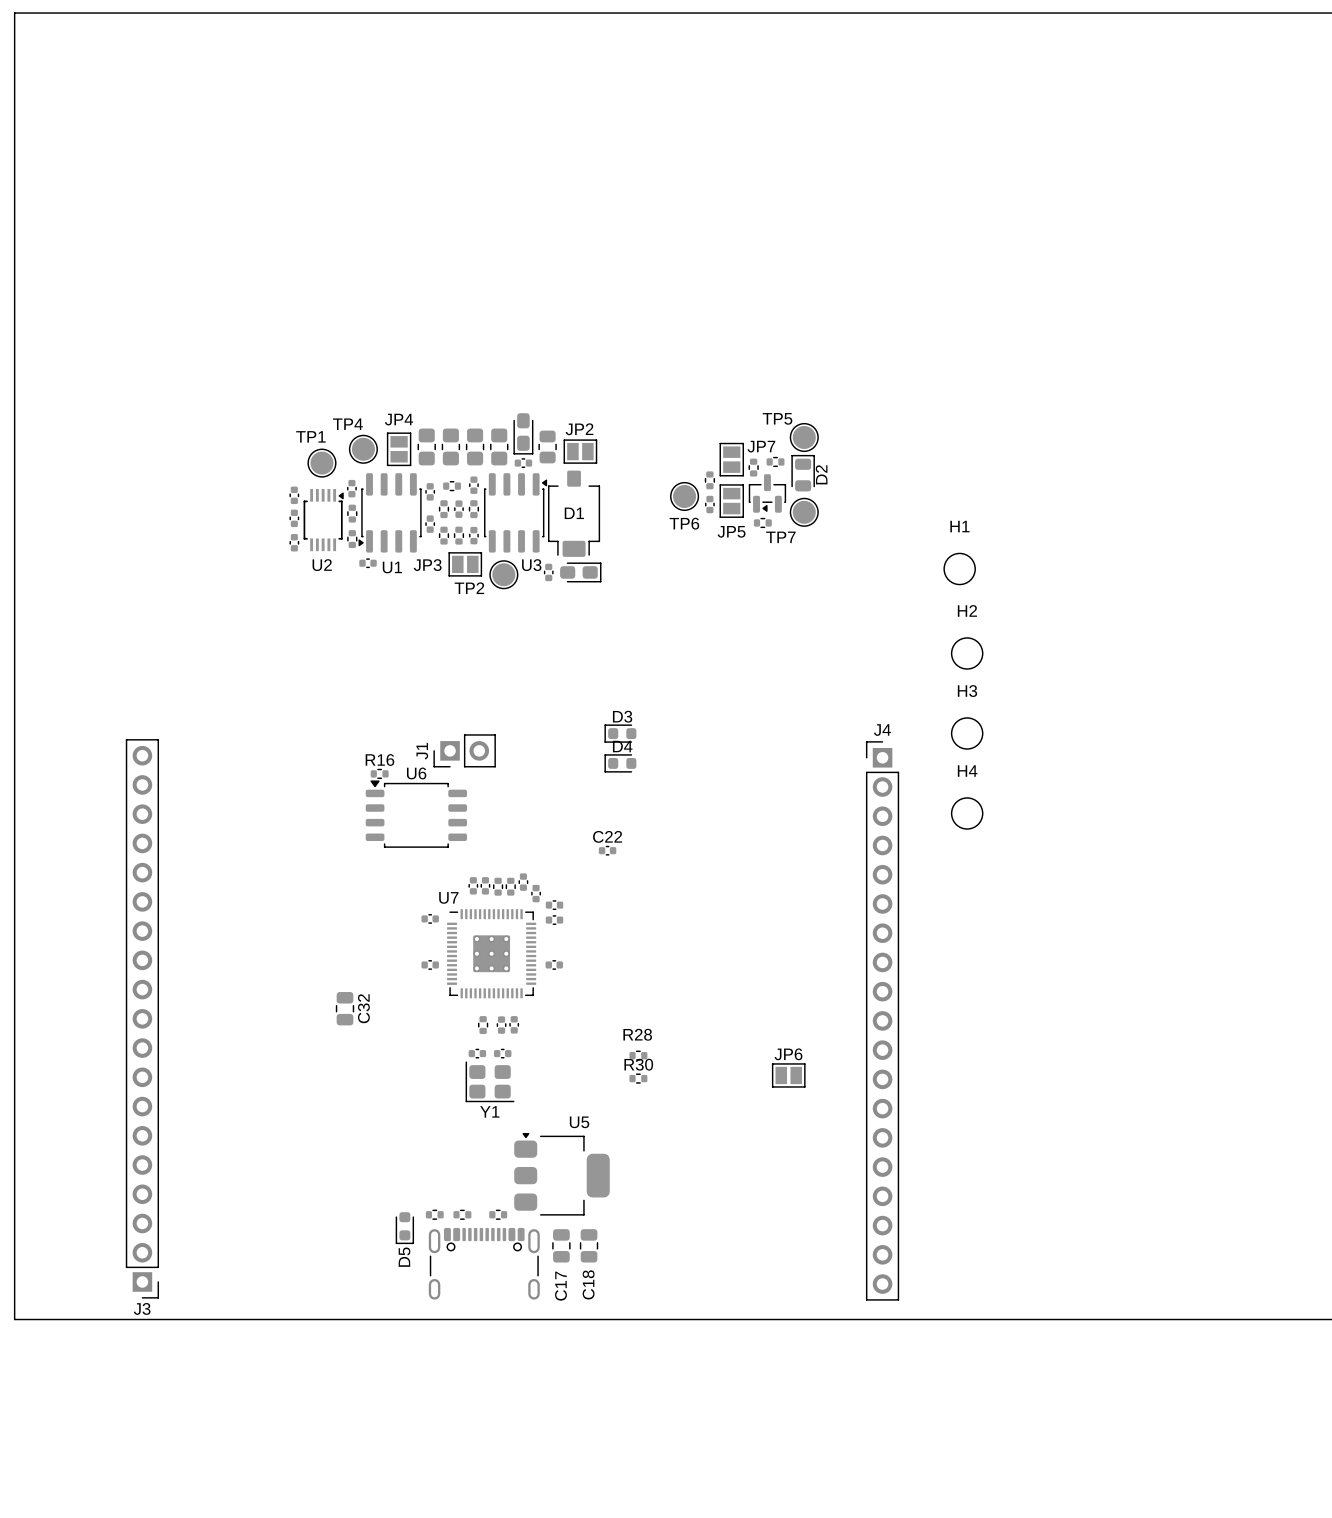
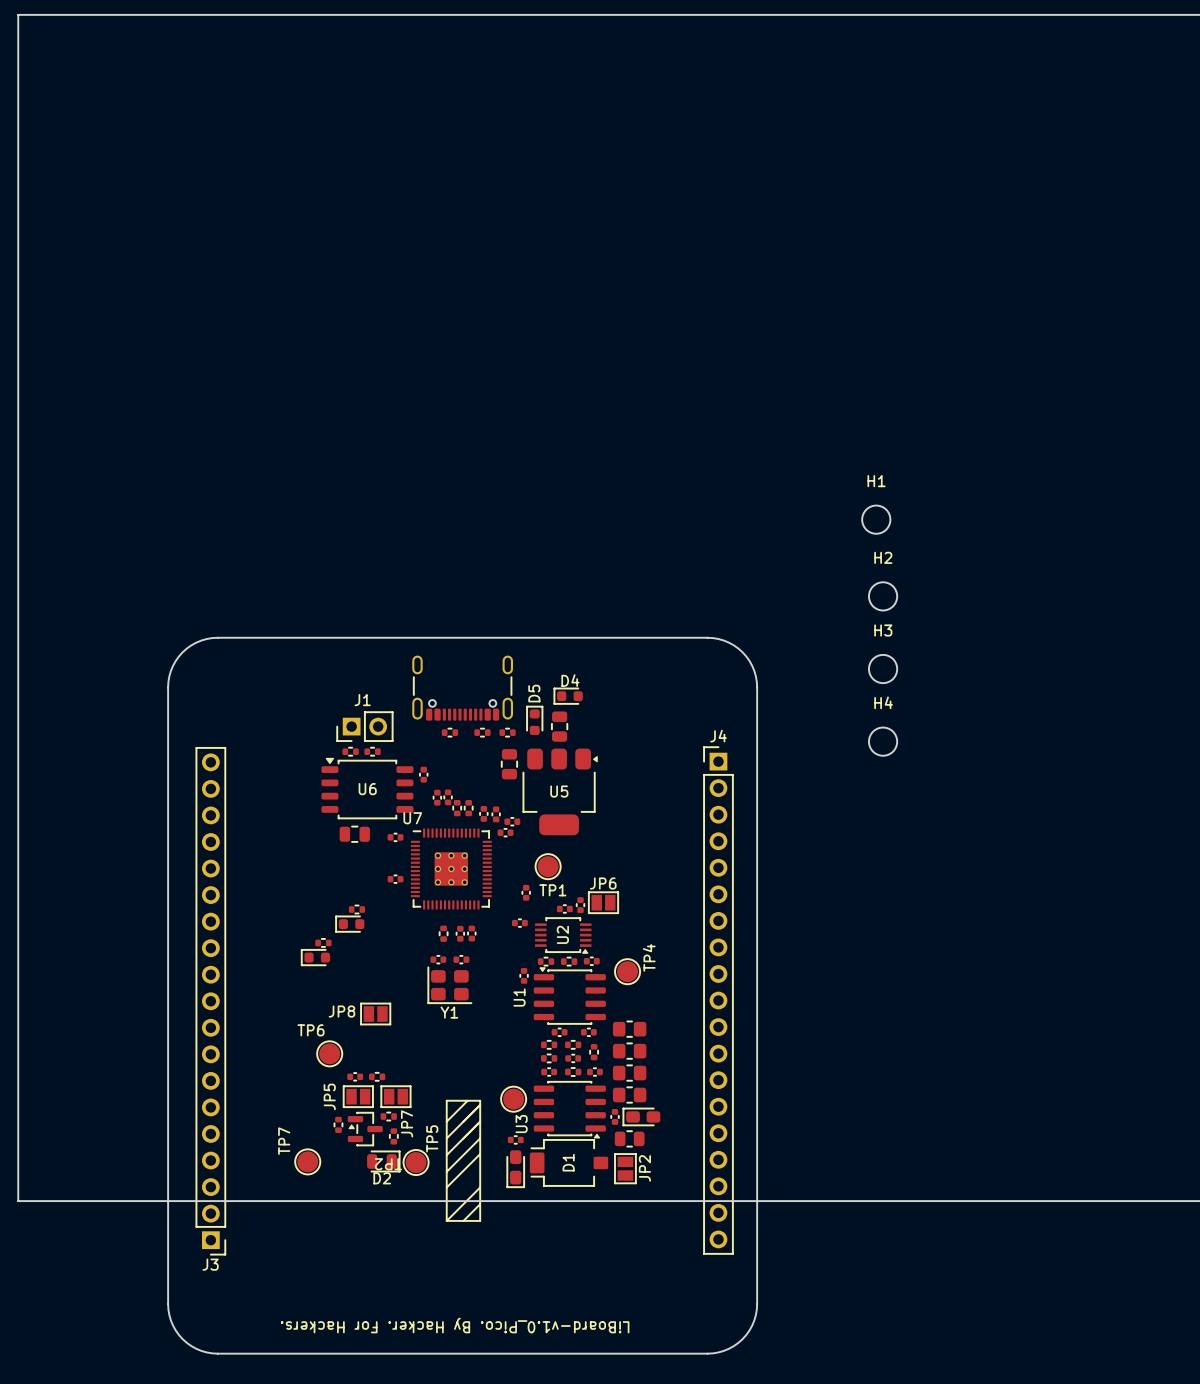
TP5 name rotation: 0° (777, 418) -> 90° counterclockwise (432, 1138)
TP5 name position: TP5 (777, 418) -> TP5 (432, 1138)
TP4 name rotation: 0° (347, 424) -> 90° counterclockwise (649, 957)
TP4 name position: TP4 (347, 424) -> TP4 (649, 957)
part: (523, 433) -> none
TP1 name position: TP1 (310, 436) -> TP1 (552, 890)
TP5 position: (804, 437) -> (416, 1162)
part: (426, 446) -> none
part: (450, 446) -> none
part: (475, 446) -> none
part: (499, 446) -> none
part: (547, 446) -> none
TP4 position: (363, 449) -> (627, 971)
JP4: (399, 449) -> none
JP2 rotation: 0° (580, 451) -> 90° clockwise (625, 1168)
JP2 position: (580, 451) -> (625, 1168)
JP7 rotation: 0° (731, 459) -> 90° clockwise (395, 1096)
JP7 position: (731, 459) -> (395, 1096)
part: (775, 461) -> none
TP1 position: (321, 463) -> (548, 866)
part: (523, 463) -> none
part: (753, 467) -> none
D2 rotation: 0° (803, 473) -> 90° clockwise (383, 1161)
D2 position: (803, 473) -> (383, 1161)
part: (709, 480) -> none
part: (473, 485) -> none
part: (452, 486) -> none
part: (351, 488) -> none
part: (430, 491) -> none
part: (767, 493) -> none
part: (294, 495) -> none
TP6 position: (684, 496) -> (329, 1053)
JP5 rotation: 0° (731, 501) -> 90° clockwise (358, 1096)
JP5 position: (731, 501) -> (358, 1096)
part: (709, 504) -> none
part: (443, 509) -> none
part: (458, 509) -> none
part: (473, 509) -> none
U1 rotation: 0° (390, 512) -> 90° clockwise (569, 995)
U1 position: (390, 512) -> (569, 995)
U3 rotation: 0° (515, 512) -> 90° clockwise (569, 1109)
U3 position: (515, 512) -> (569, 1109)
TP7 position: (804, 512) -> (307, 1161)
part: (352, 513) -> none
D1 rotation: 0° (574, 513) -> 90° clockwise (569, 1162)
D1 position: (574, 513) -> (569, 1162)
part: (294, 518) -> none
U2 rotation: 0° (323, 520) -> 90° clockwise (563, 935)
U2 position: (323, 520) -> (563, 935)
part: (762, 522) -> none
TP6 name position: TP6 (684, 523) -> TP6 (311, 1030)
part: (430, 524) -> none
part: (443, 535) -> none
part: (458, 535) -> none
part: (473, 535) -> none
TP7 name rotation: 0° (780, 537) -> 90° counterclockwise (284, 1141)
TP7 name position: TP7 (780, 537) -> TP7 (284, 1141)
part: (352, 539) -> none
part: (294, 542) -> none
part: (368, 563) -> none
JP3: (465, 564) -> none
U2 name position: U2 (322, 565) -> U2 (562, 934)
part: (548, 572) -> none
part: (580, 572) -> none
part: (503, 574) -> none
text: TP2 (469, 588) -> none
board edge: none -> (217, 637) (707, 637) (729, 642) (746, 656) (754, 671) (757, 687) (757, 1304) (752, 1325) (738, 1342) (723, 1350) (707, 1353) (217, 1353) (196, 1348) (178, 1334) (170, 1320) (168, 1304) (168, 687) (173, 665) (182, 652) (201, 640) (217, 637)
D3: (620, 733) -> none
J1 position: (464, 750) -> (364, 726)
J1 name rotation: 0° (422, 751) -> 90° clockwise (362, 700)
J1 name position: J1 (422, 751) -> J1 (362, 700)
part: none -> (462, 688)
R16: (379, 773) -> none
U6 name position: U6 (416, 773) -> U6 (367, 789)
part: none -> (559, 726)
part: none -> (449, 732)
part: none -> (482, 732)
part: none -> (507, 732)
U6 position: (416, 814) -> (367, 788)
part: none -> (350, 751)
part: none -> (372, 751)
part: none -> (509, 764)
part: none -> (423, 774)
C22: (607, 850) -> none
part: none -> (448, 797)
part: none -> (437, 797)
part: (523, 882) -> none
part: (473, 885) -> none
part: (485, 885) -> none
part: none -> (483, 813)
part: (536, 893) -> none
part: none -> (496, 814)
part: none -> (512, 821)
part: (554, 905) -> none
part: none -> (505, 832)
part: none -> (354, 834)
part: (554, 920) -> none
part rotation: 0° (554, 964) -> 90° clockwise (526, 892)
part position: (554, 964) -> (526, 892)
part: none -> (580, 905)
part: none -> (564, 908)
part: none -> (356, 909)
C32: (345, 1008) -> none
part: none -> (519, 923)
part: none -> (349, 924)
J3 position: (142, 1018) -> (210, 1001)
J4 position: (882, 1020) -> (718, 1000)
part: none -> (323, 942)
part: none -> (315, 957)
part: none -> (546, 961)
part: none -> (569, 961)
R28: (638, 1055) -> none
part: none -> (591, 961)
part: none -> (524, 975)
JP6 position: (788, 1075) -> (603, 902)
R30: (638, 1078) -> none
JP8: none -> (375, 1014)
U5 name position: U5 (579, 1122) -> U5 (559, 791)
part: none -> (629, 1029)
part: none -> (559, 1032)
part: none -> (588, 1032)
part: none -> (549, 1044)
part: none -> (573, 1044)
part: none -> (629, 1051)
part: none -> (594, 1052)
part: none -> (549, 1058)
part: none -> (573, 1058)
U5 rotation: 0° (561, 1174) -> 90° clockwise (560, 791)
U5 position: (561, 1174) -> (560, 791)
part: none -> (549, 1072)
part: none -> (573, 1072)
part: none -> (594, 1072)
part: none -> (629, 1073)
part: none -> (355, 1076)
part: none -> (377, 1076)
part: none -> (629, 1095)
part: none -> (513, 1099)
line: none -> (467, 1100) (446, 1121)
line: none -> (480, 1104) (446, 1138)
part position: (434, 1214) -> (388, 1116)
part: (462, 1214) -> none
part: (498, 1214) -> none
part: none -> (615, 1116)
part: none -> (641, 1116)
D5 rotation: 0° (404, 1228) -> 180° (534, 720)
D5 position: (404, 1228) -> (534, 720)
line: none -> (480, 1121) (446, 1155)
part: none -> (338, 1124)
part: none -> (365, 1129)
C17: (561, 1245) -> none
C18: (589, 1245) -> none
part: none -> (393, 1136)
line: none -> (480, 1138) (446, 1171)
part: none -> (629, 1138)
part: none -> (515, 1139)
part: (484, 1263) -> none
line: none -> (480, 1154) (446, 1187)
text: none -> TP2 (388, 1164)
part: none -> (515, 1169)
line: none -> (480, 1187) (446, 1220)
line: none -> (480, 1204) (463, 1220)
line: none -> (446, 1220) (480, 1220) (480, 1100) (446, 1100) (446, 1220)
text: none -> LiBoard-v1.0_Pico. By Hacker. For Hackers. (455, 1325)

